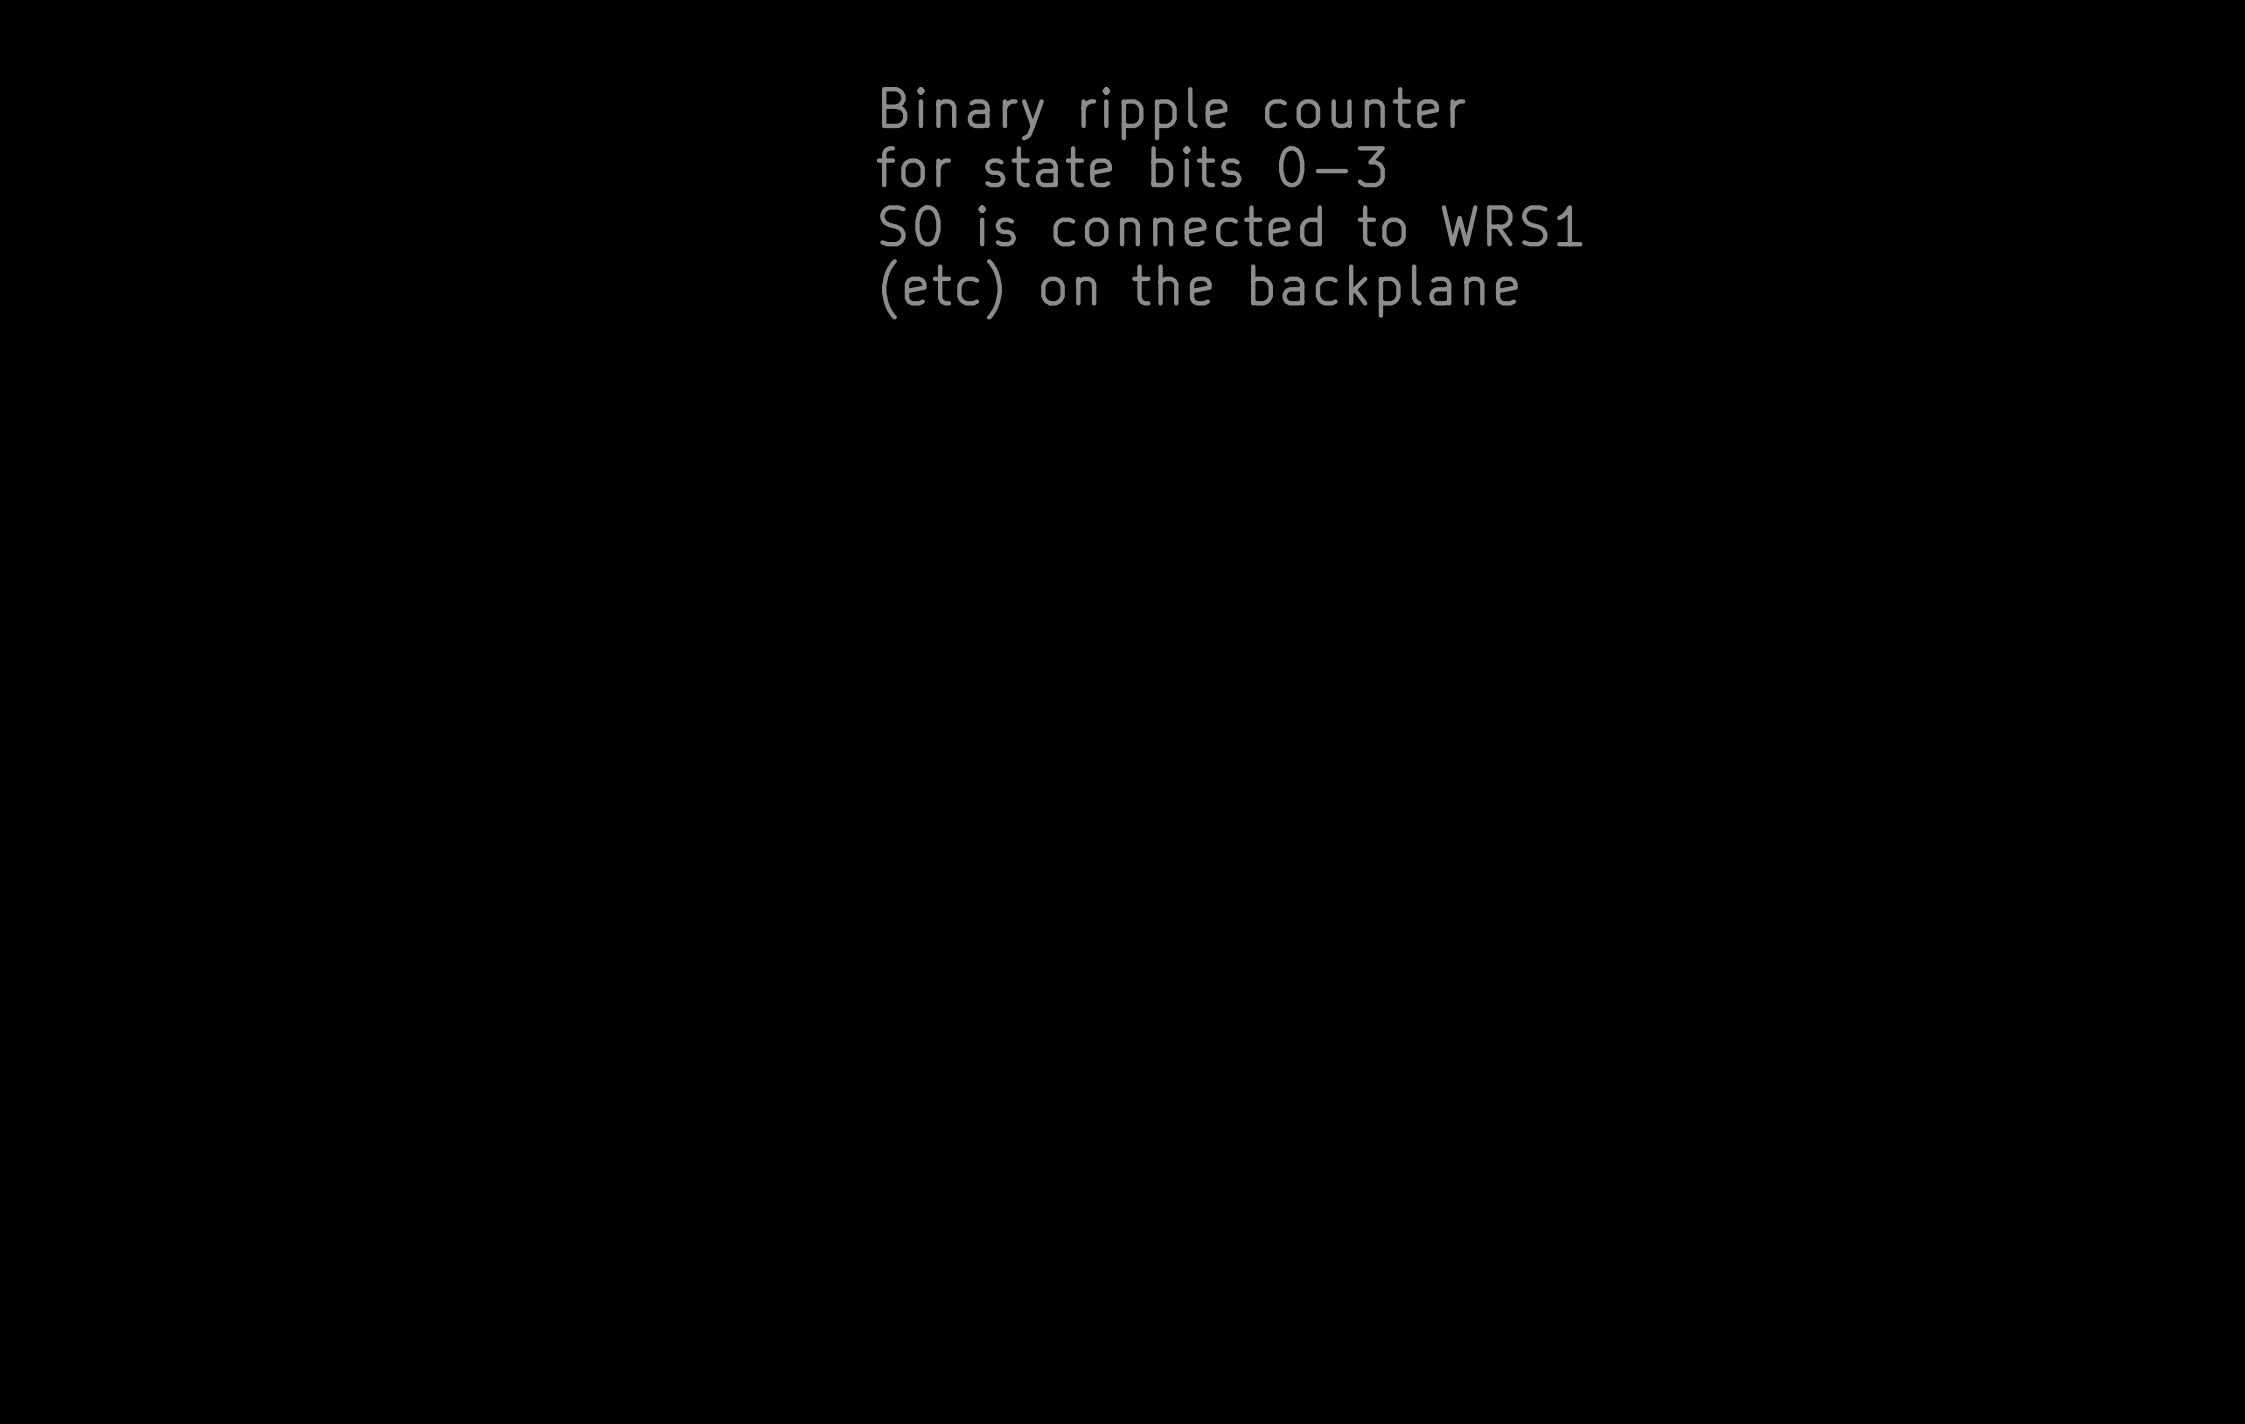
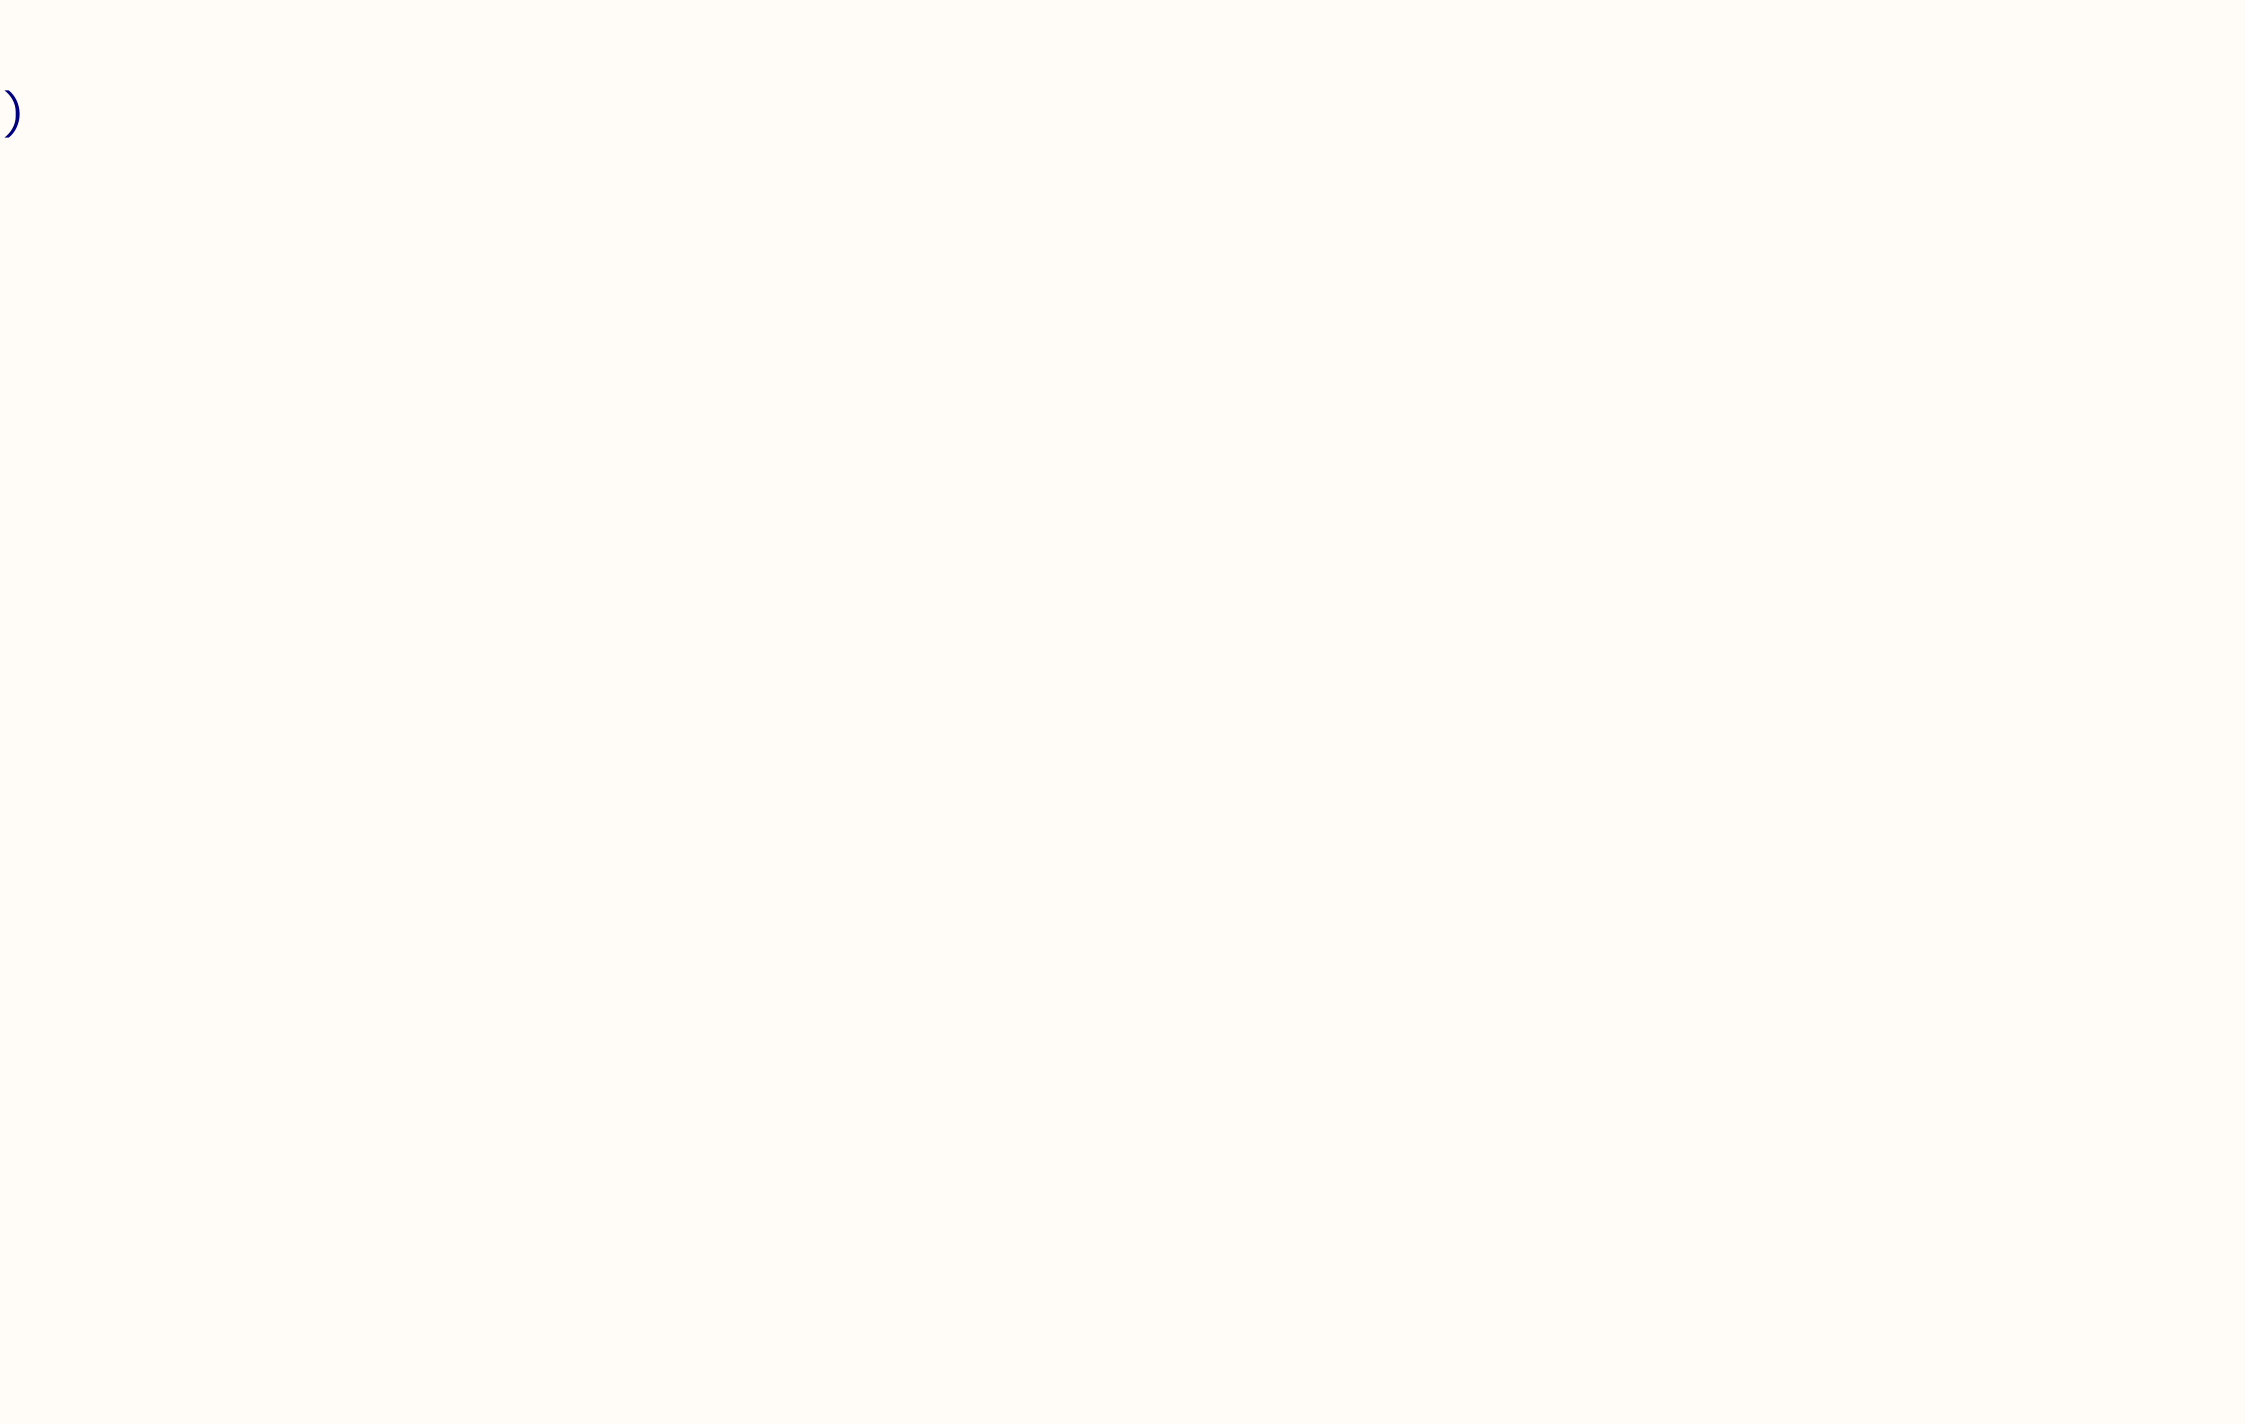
text: Binary ripple counter (1173, 113) -> none
text: for state bits 0-3 (1130, 166) -> none
text: S0 is connected to WRS1 (1231, 225) -> none
text: (etc) on the backplane (1199, 289) -> none

